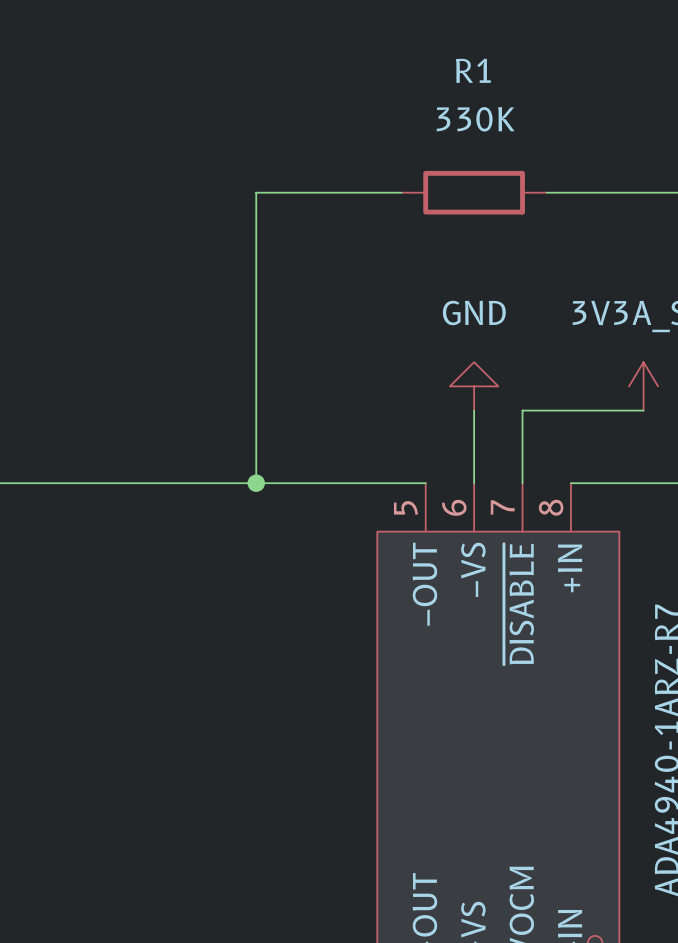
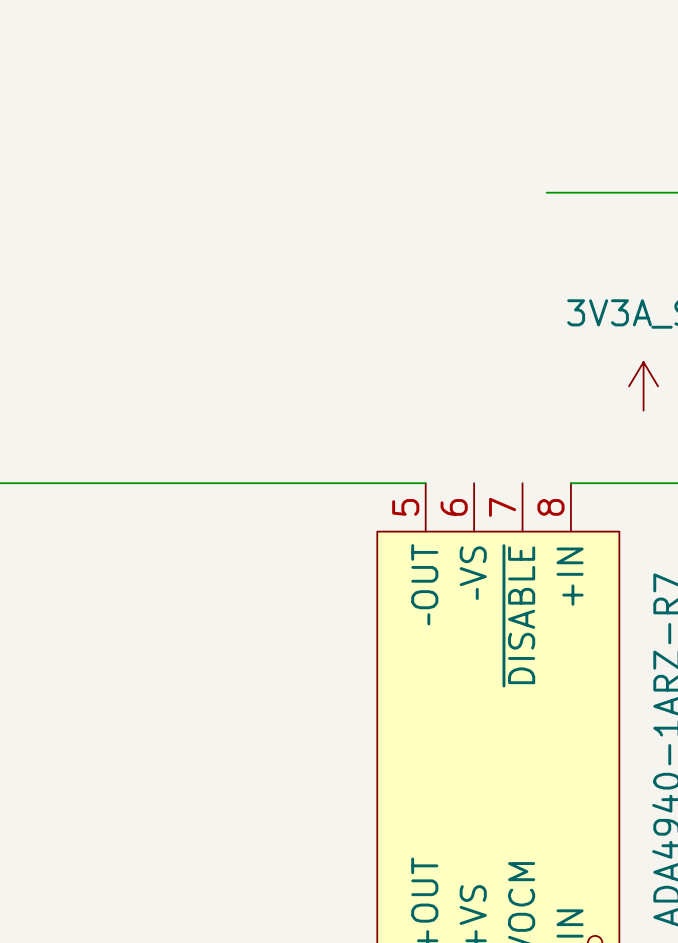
wire: (401, 192) (256, 192) (256, 483) -> none
R1: 330K (474, 192) -> none
power symbol: GND (474, 386) -> none
wire: (474, 410) (474, 483) -> none
wire: (643, 410) (522, 410) (522, 483) -> none
junction: (256, 483) -> none

